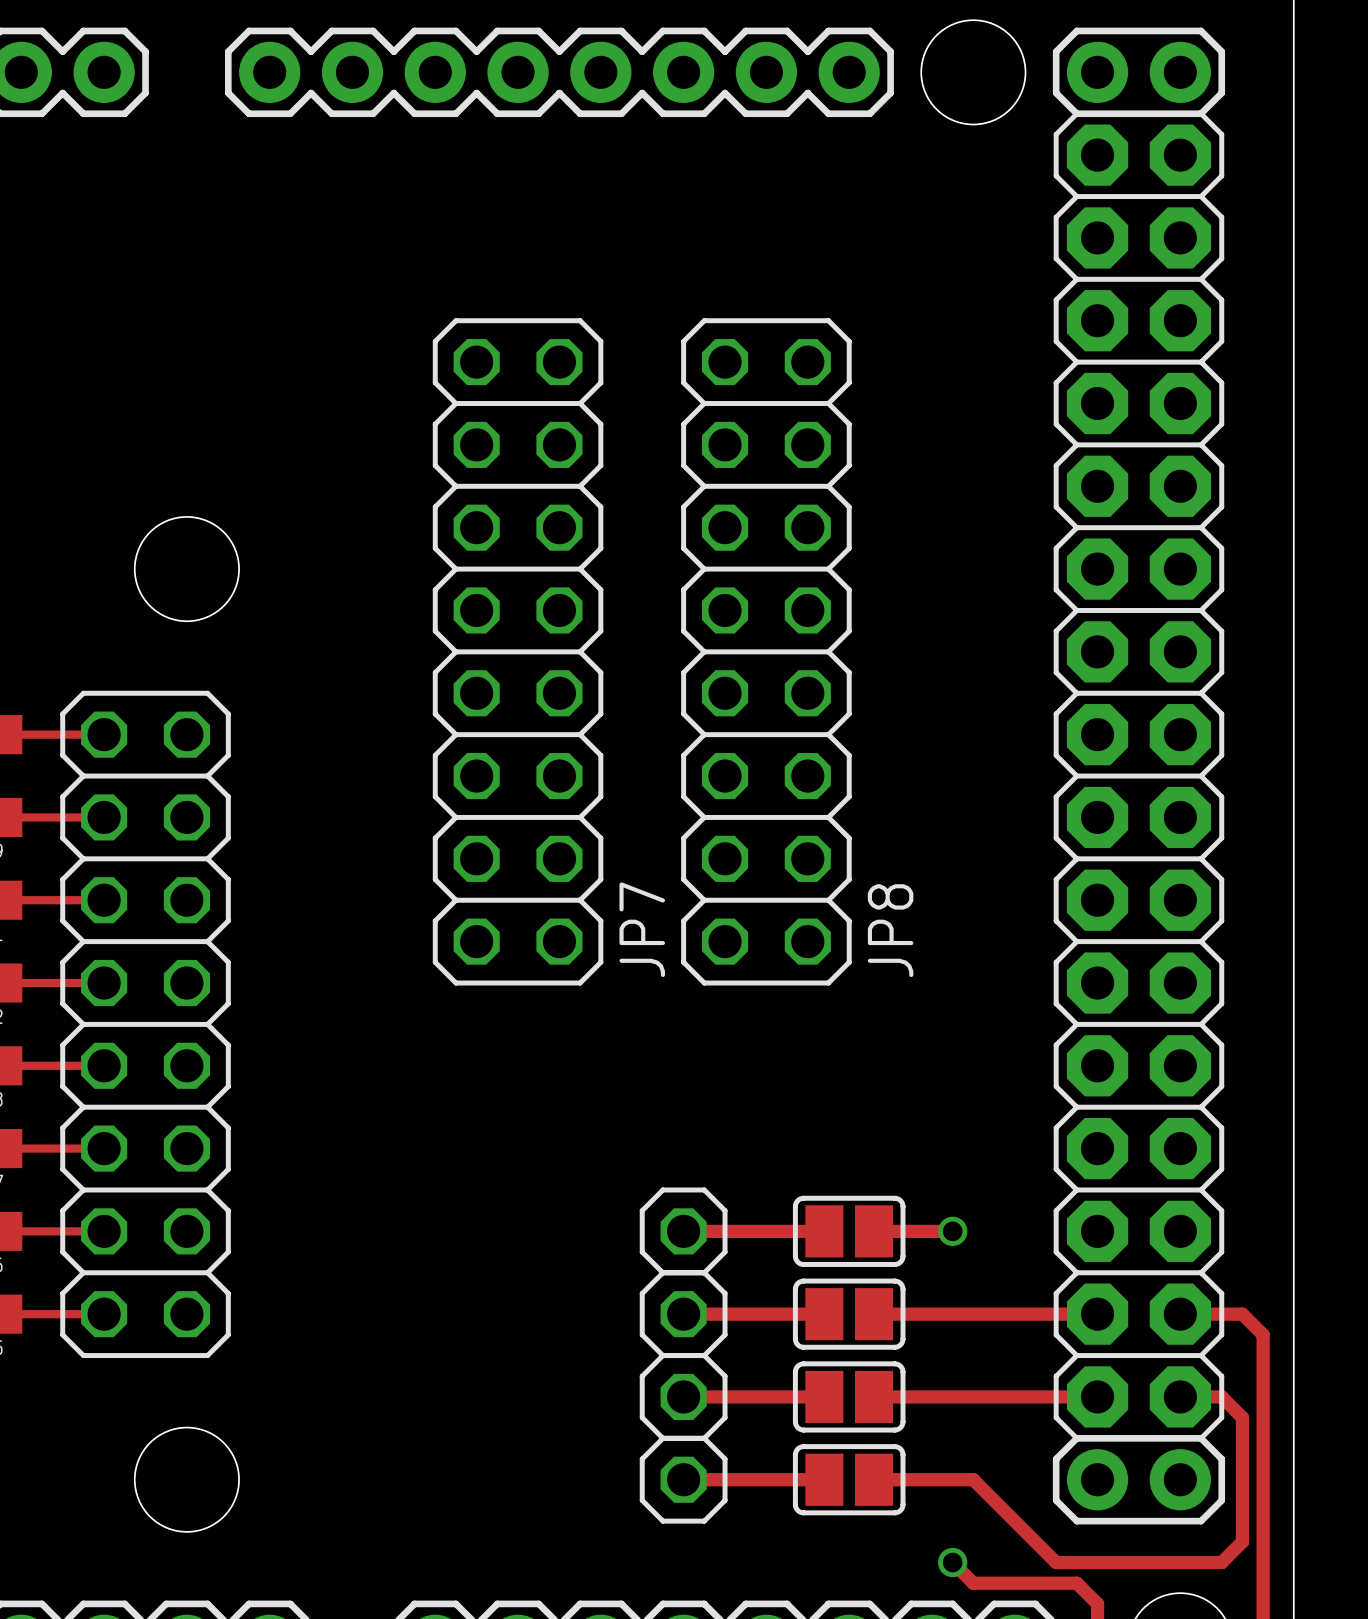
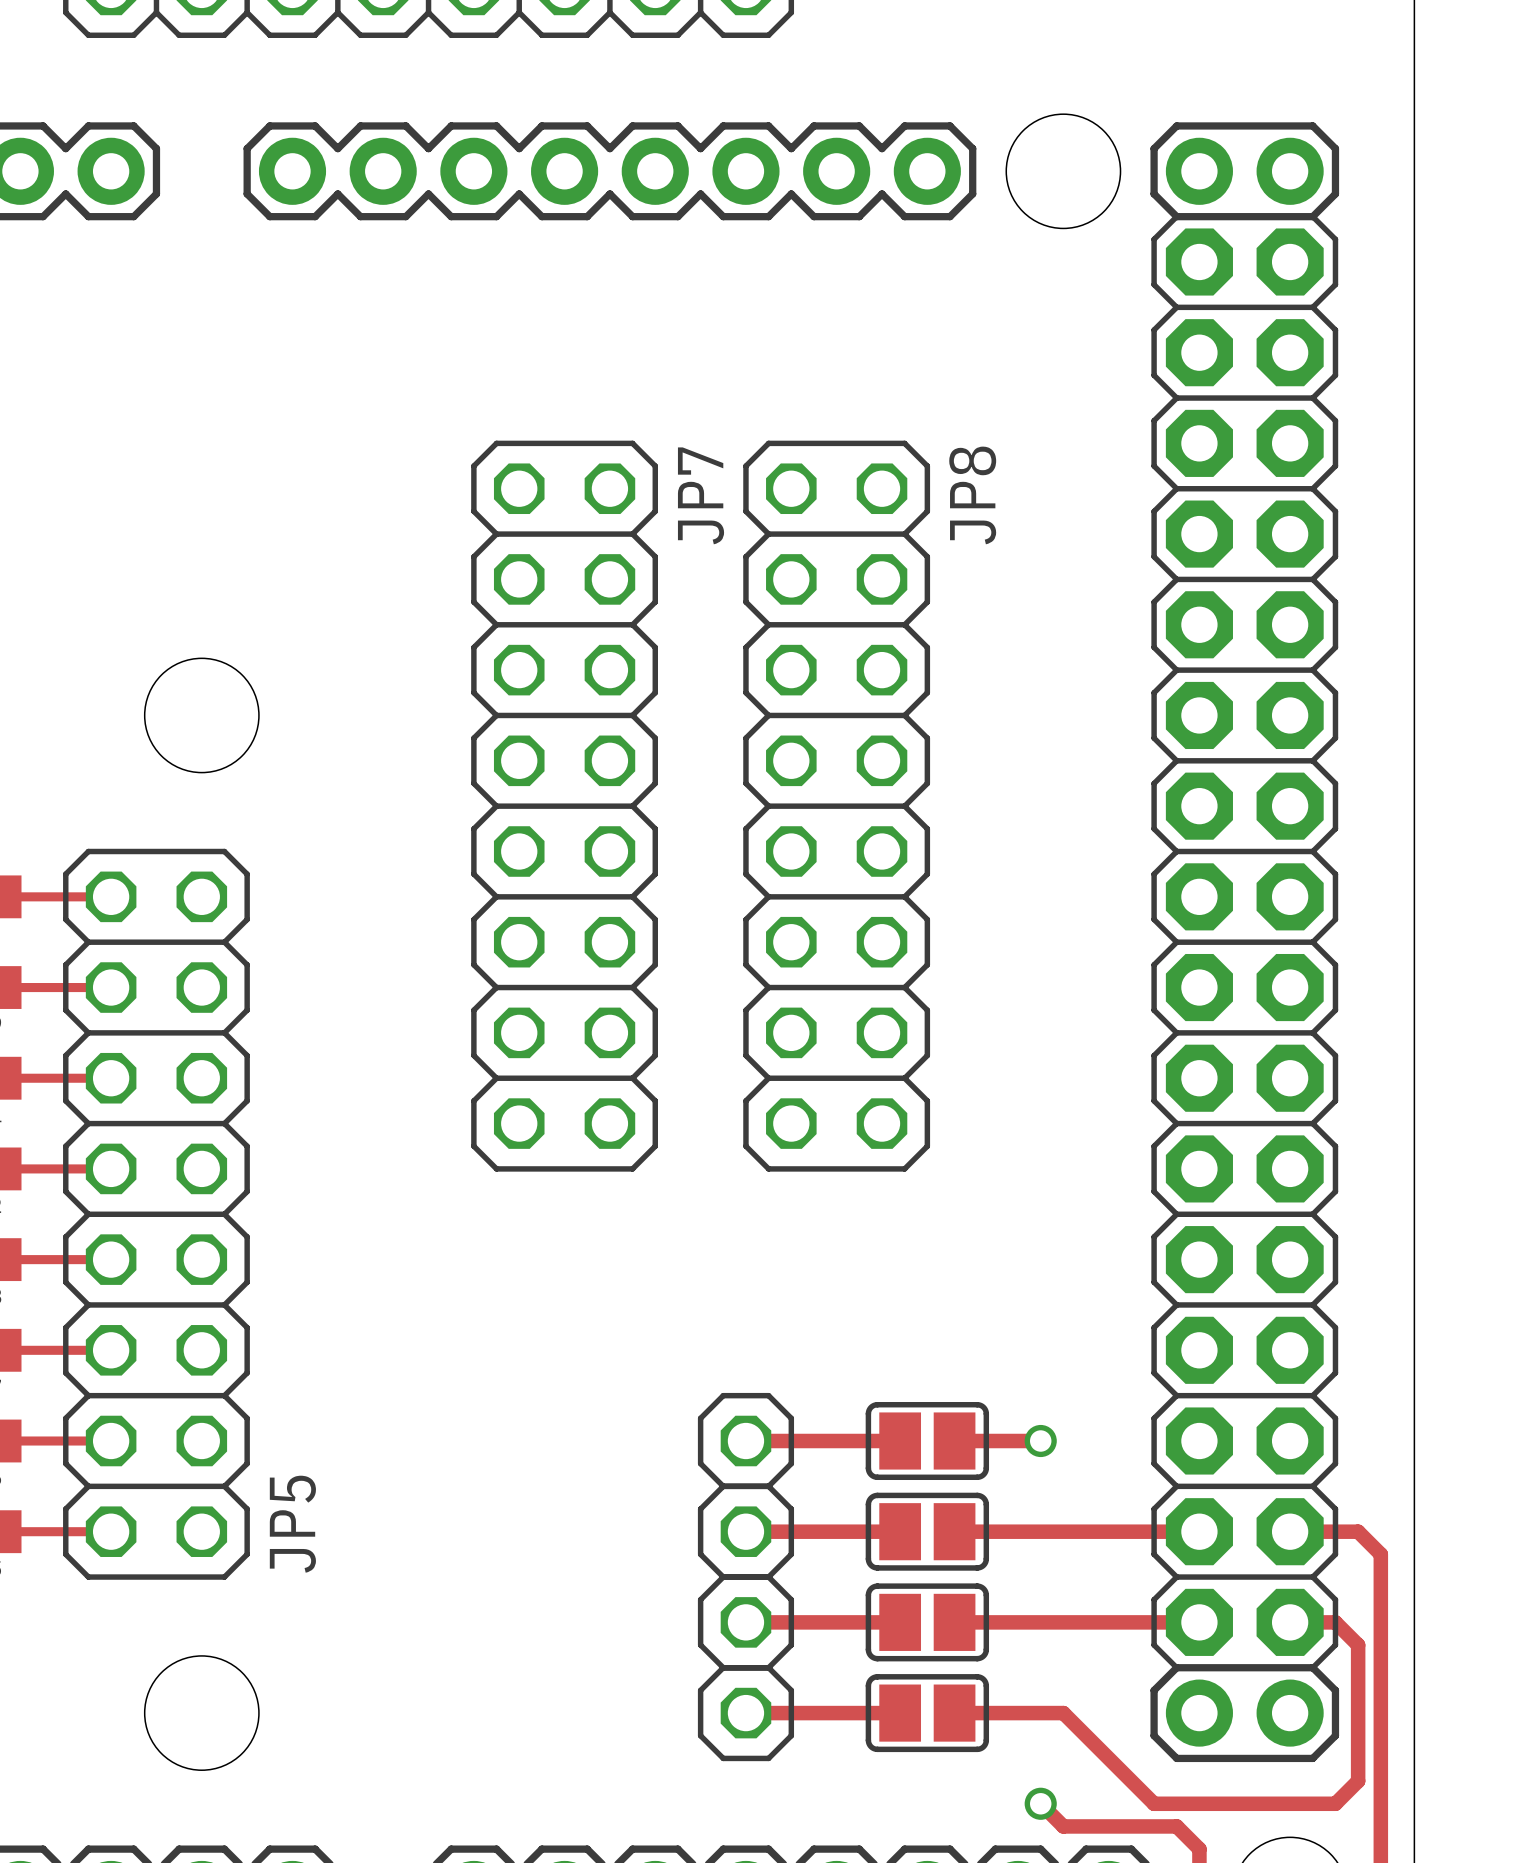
JP7 name position: JP7 (642, 929) -> JP7 (701, 495)
JP8 name position: JP8 (890, 930) -> JP8 (972, 495)
JP5 name: none -> JP5 (292, 1524)

